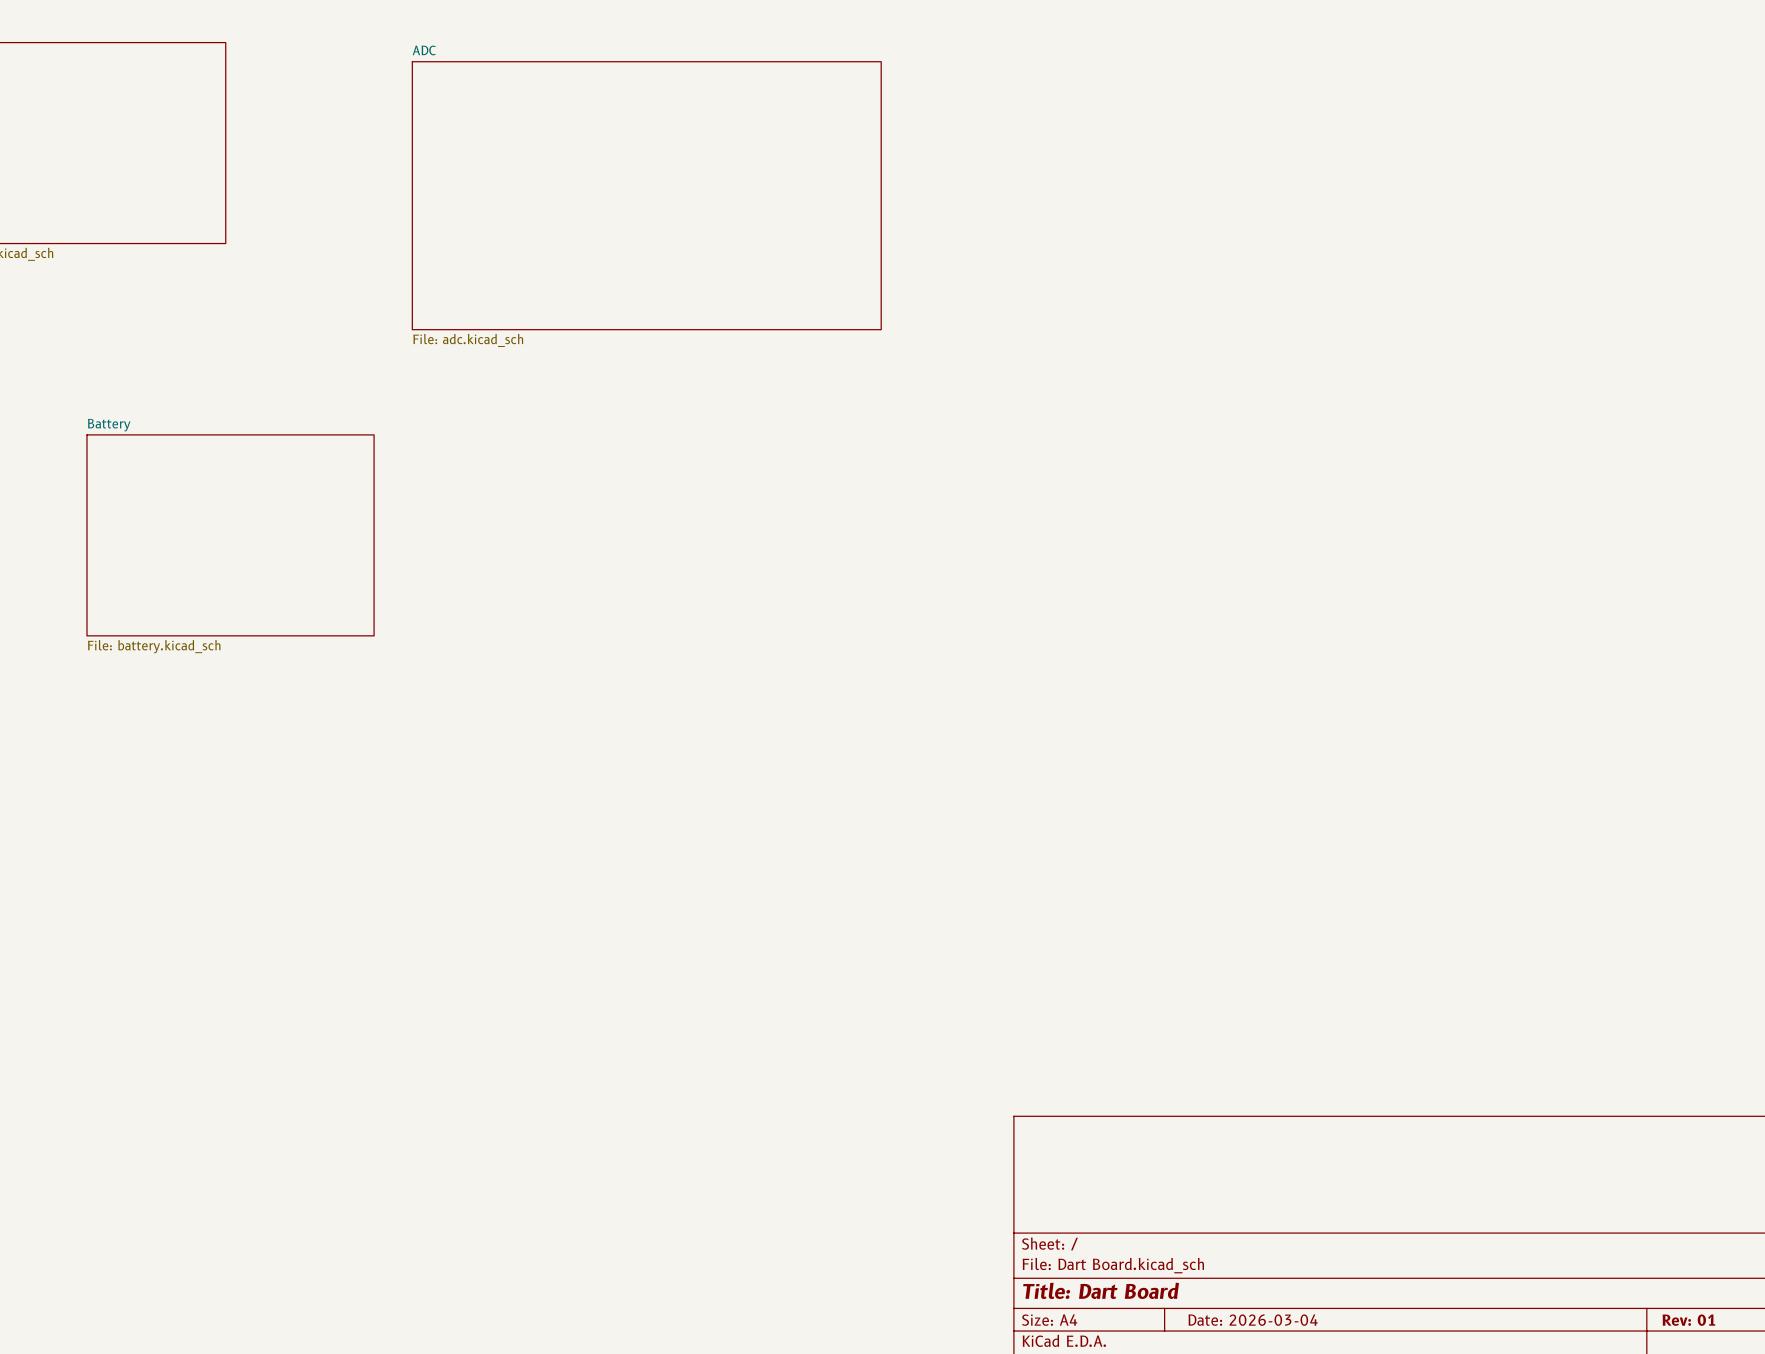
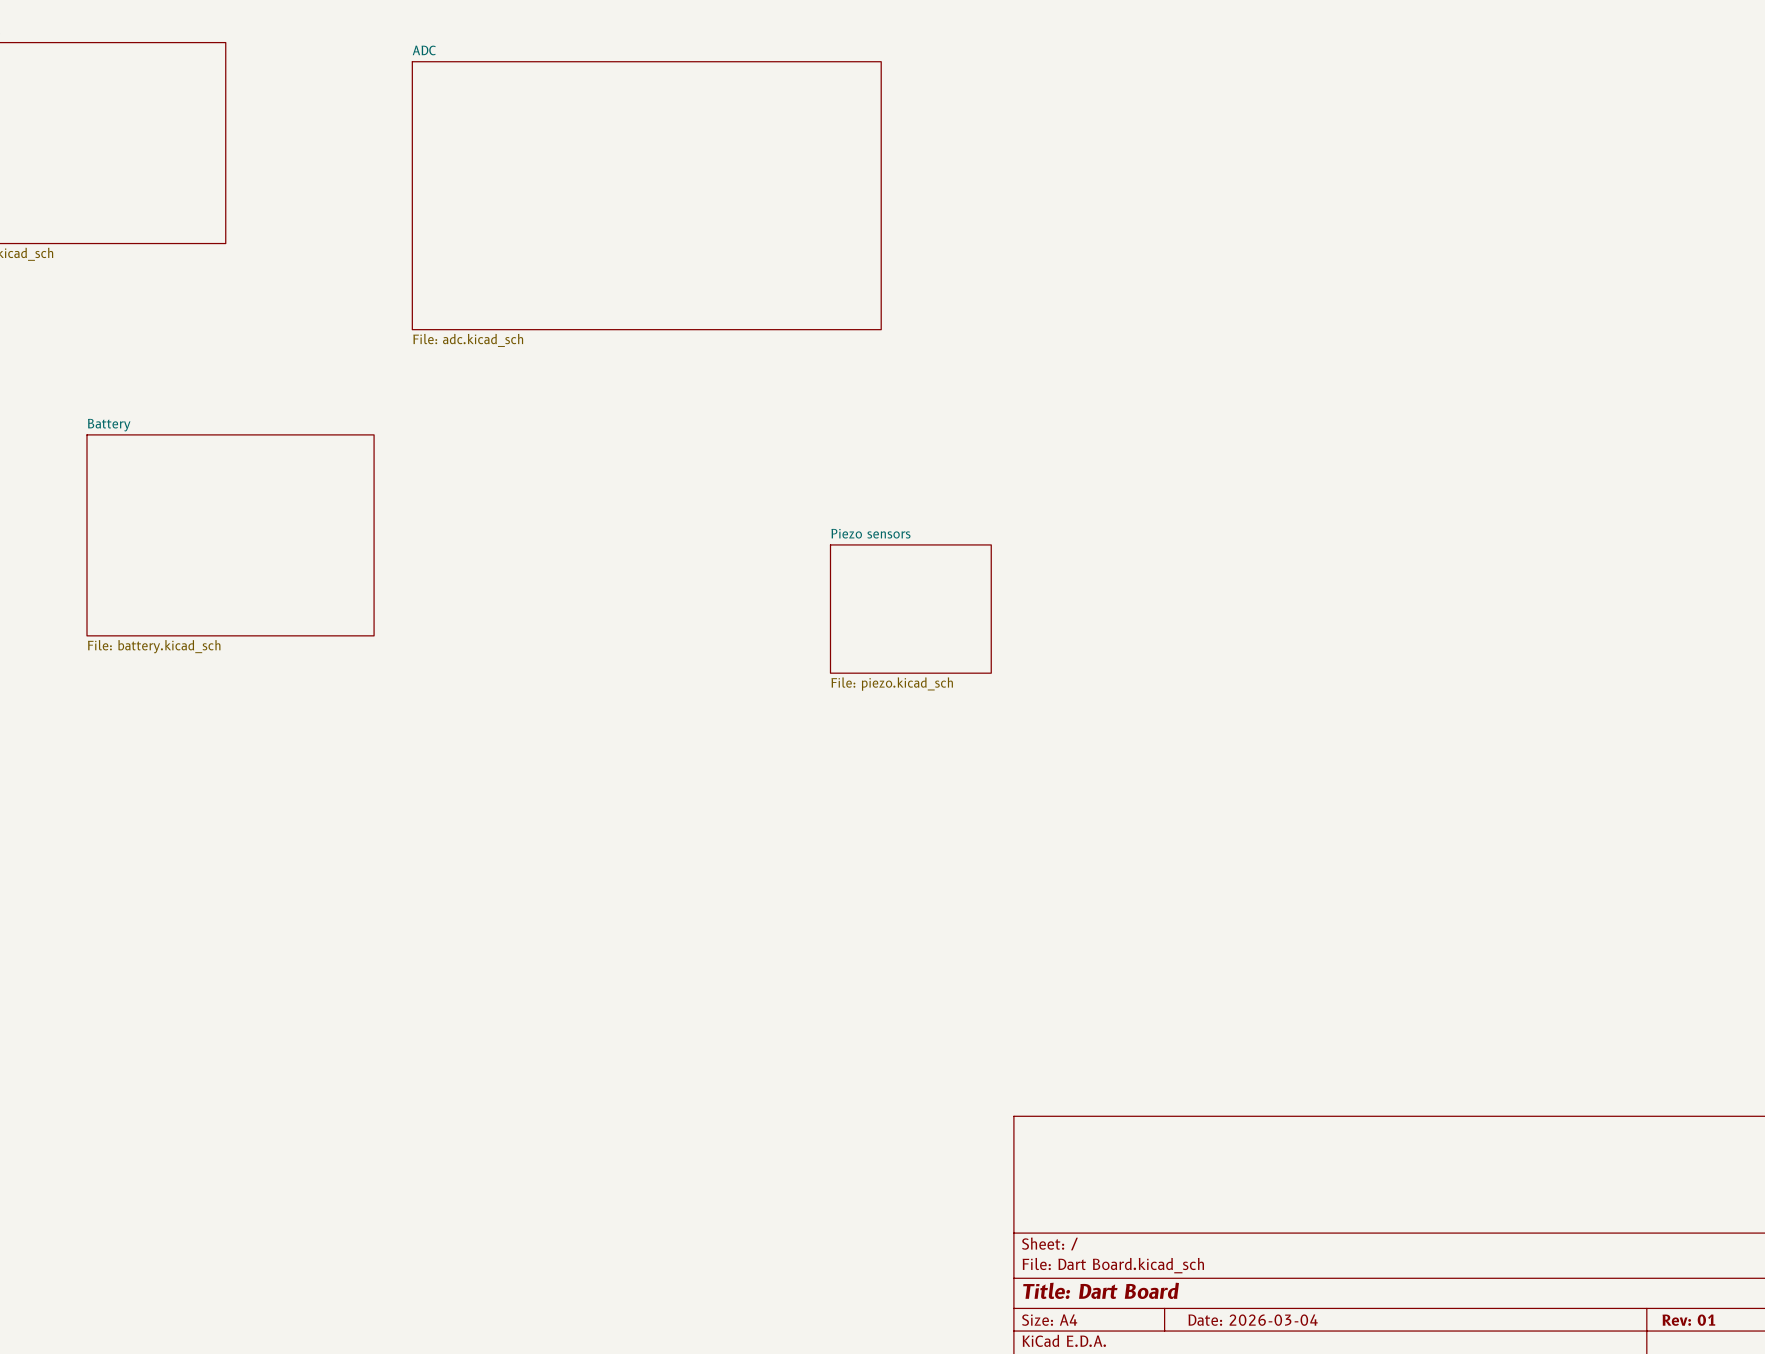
sheet Piezo sensors: none -> File: piezo.kicad_sch (910, 609)

